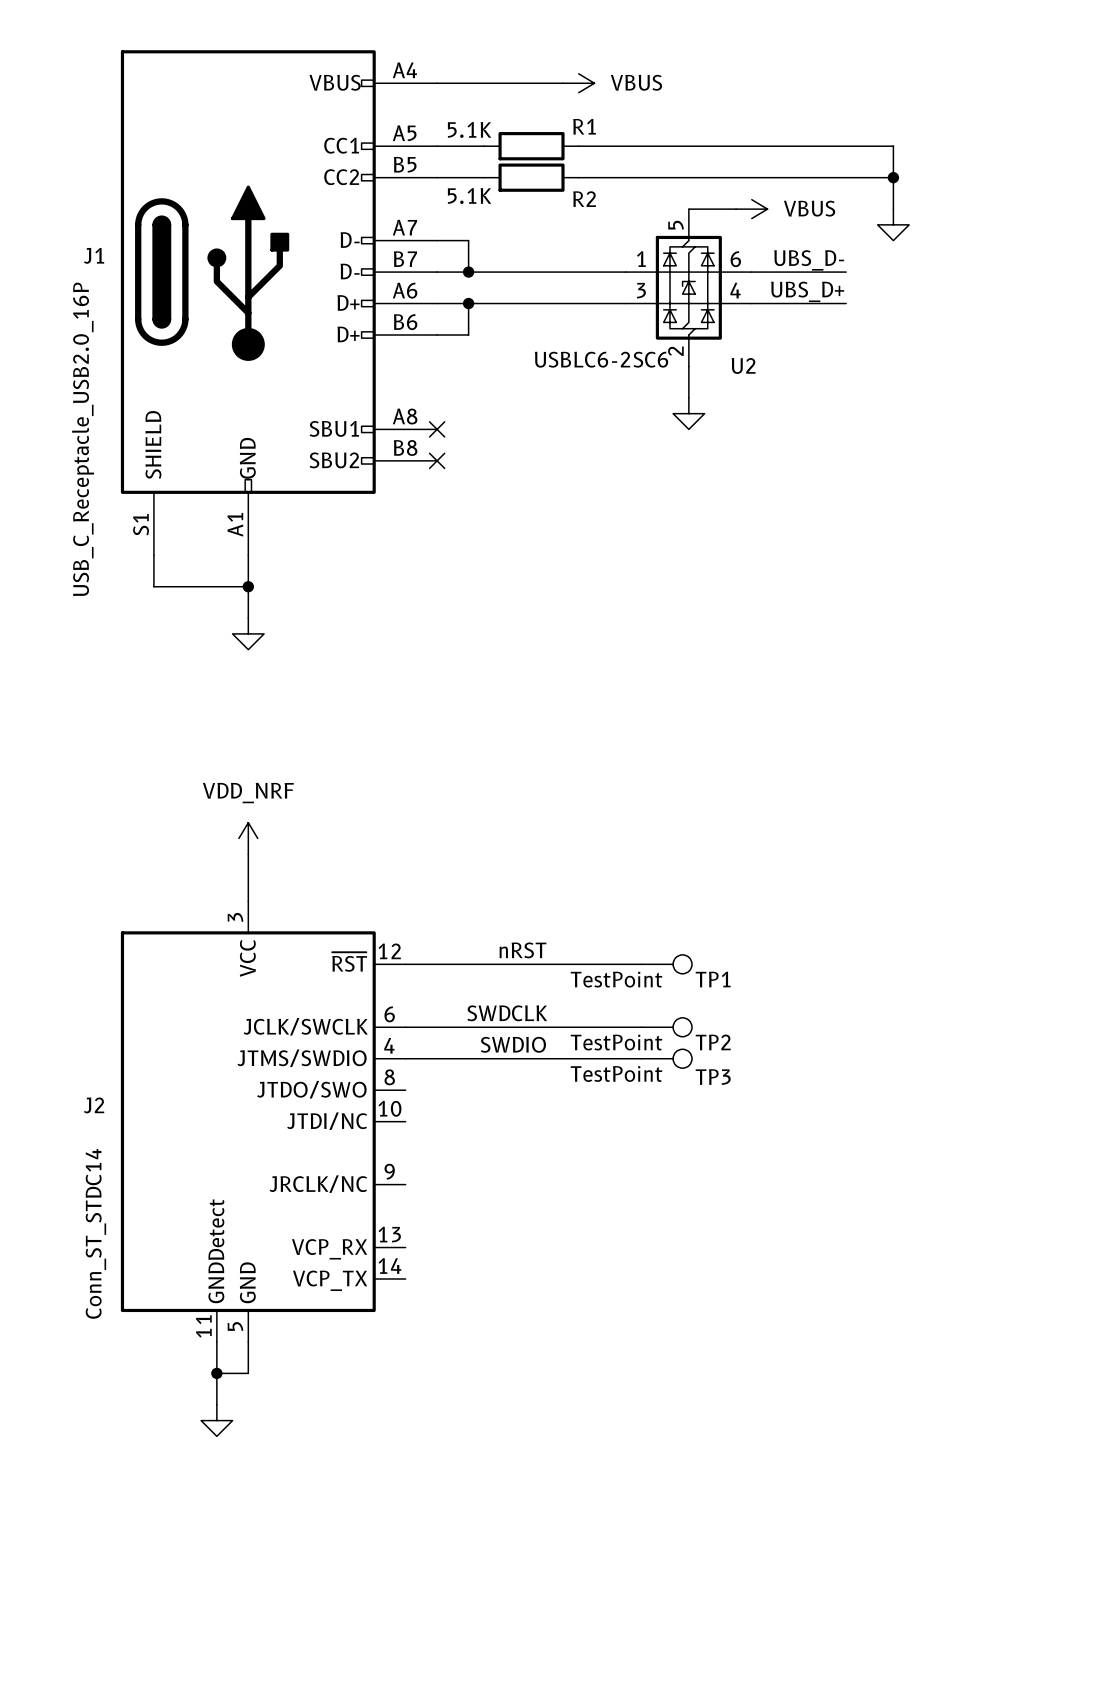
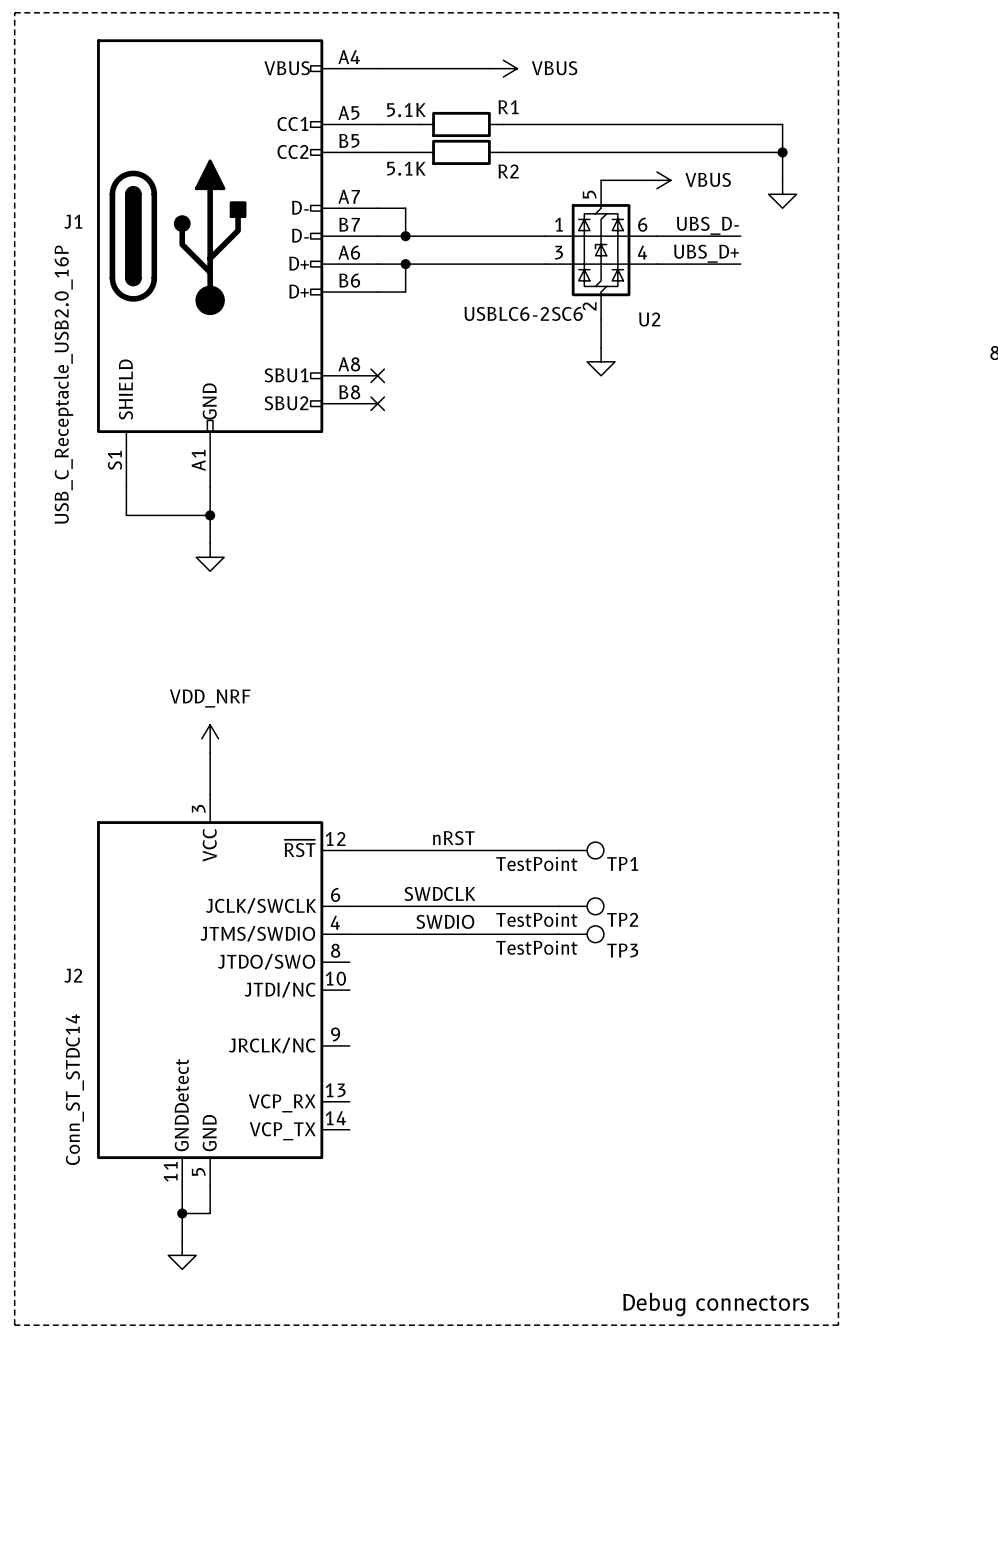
line: none -> (14, 12) (838, 12) (838, 1325) (14, 1325) (14, 12)
text: none -> Debug connectors (715, 1304)

